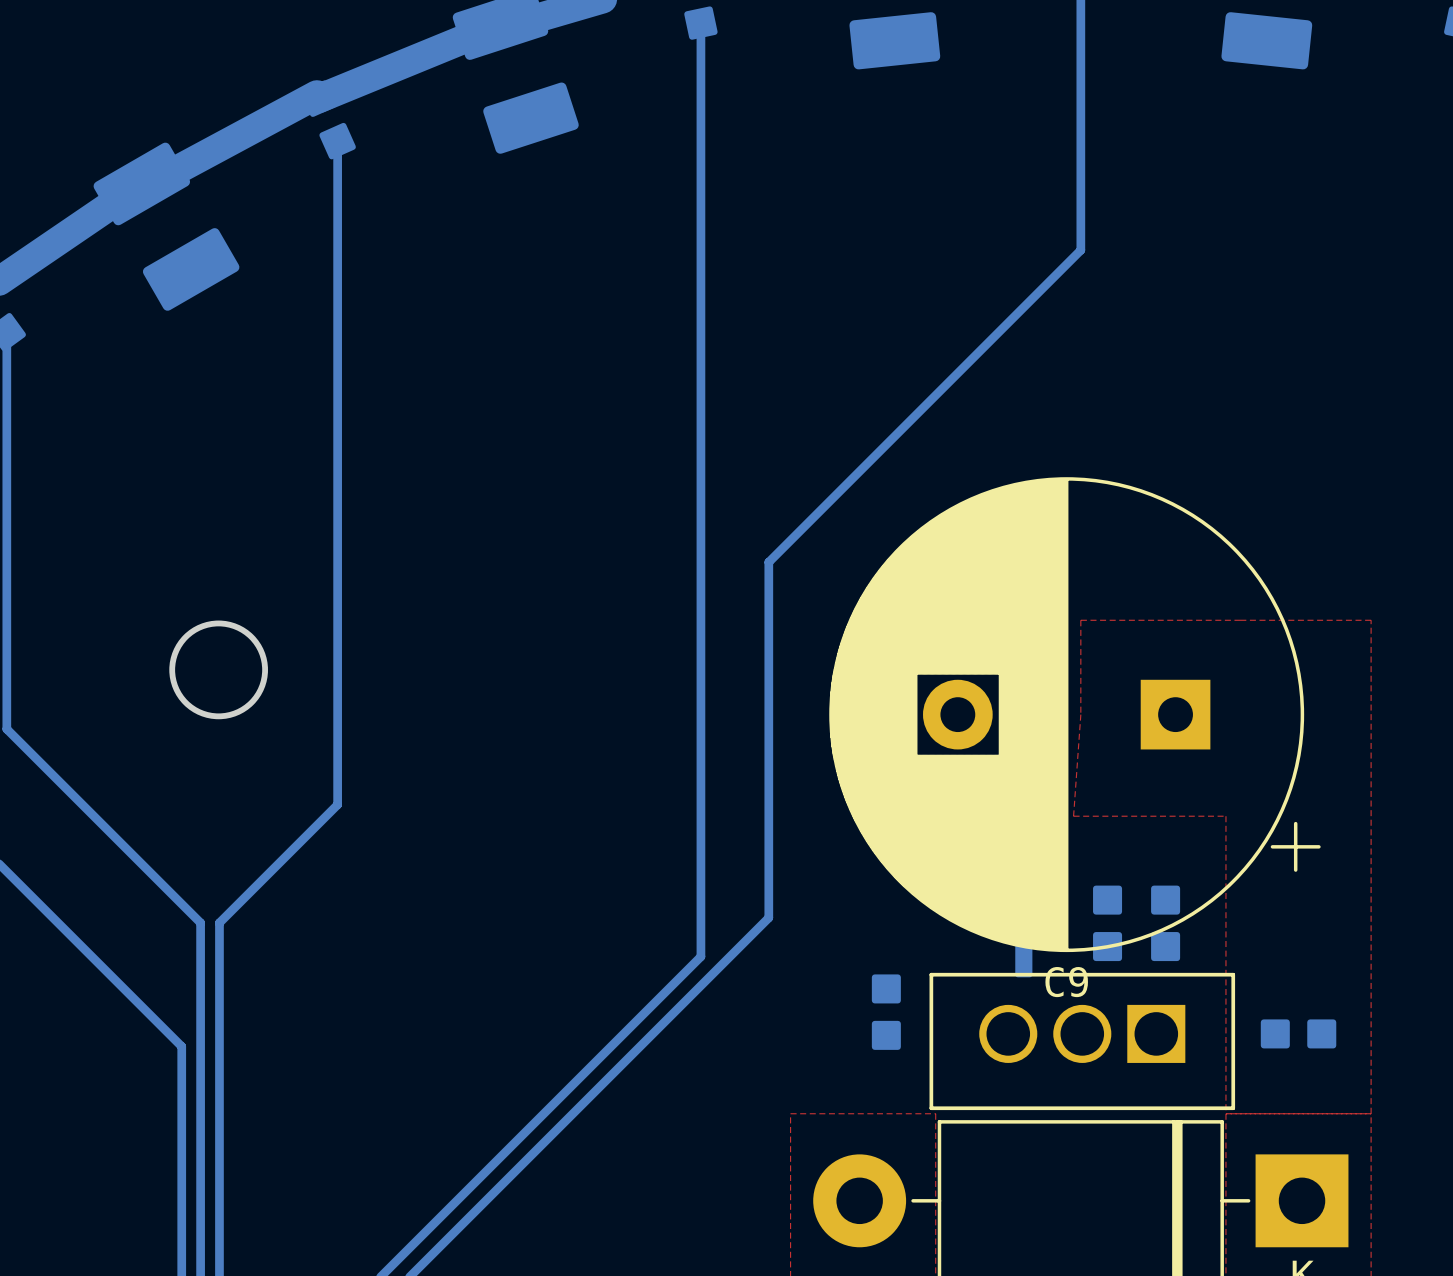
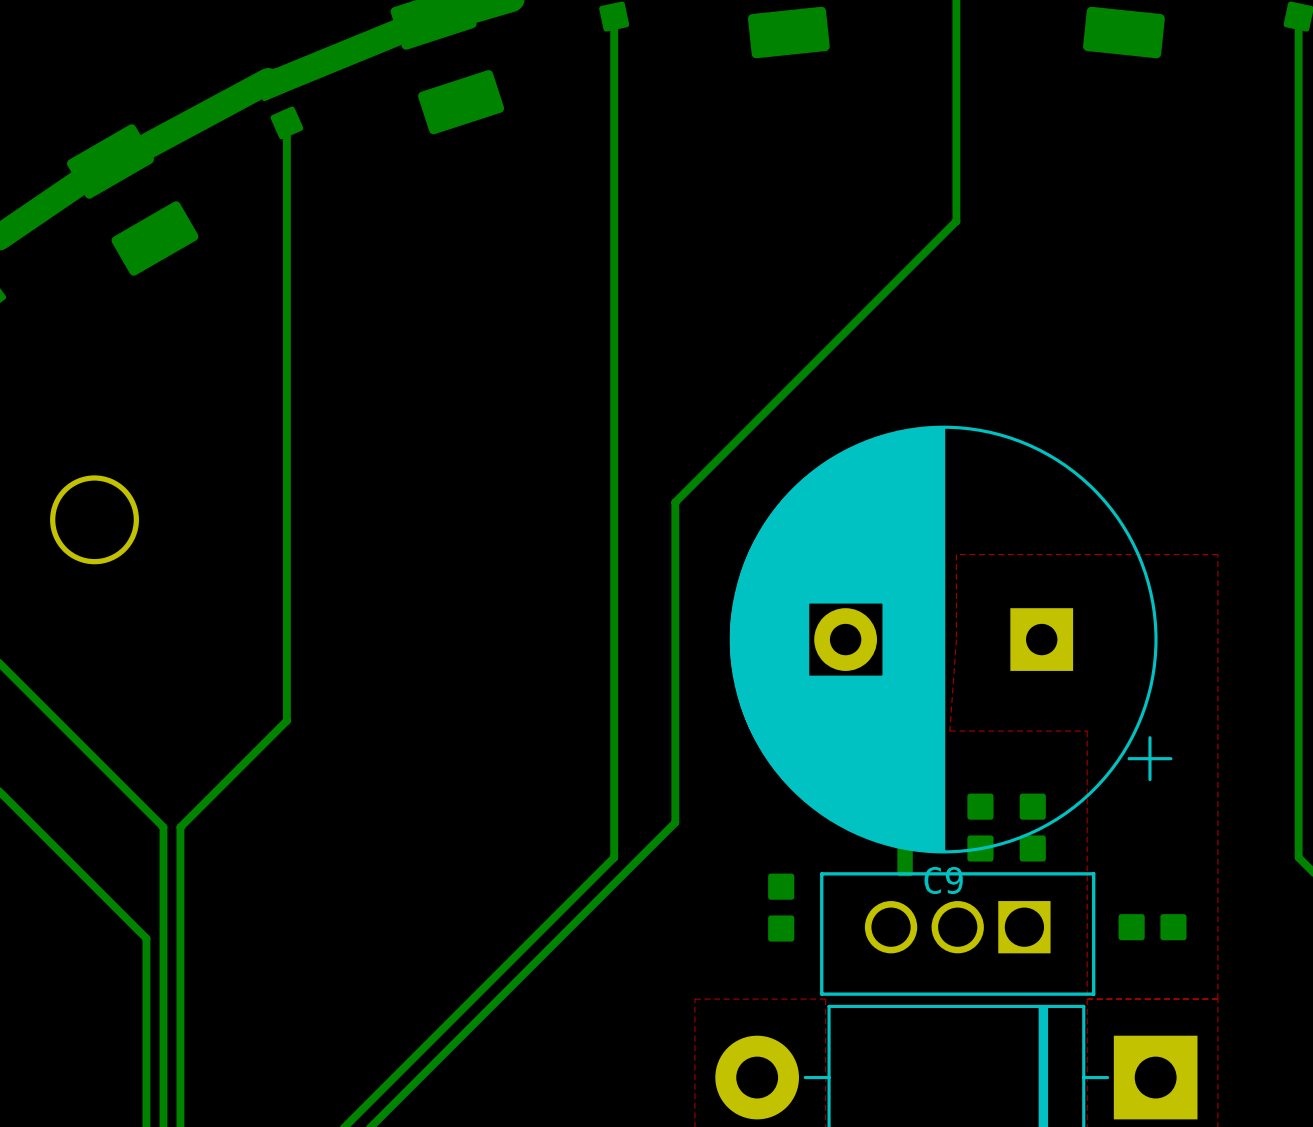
round board edge position: (218, 669) -> (94, 519)

